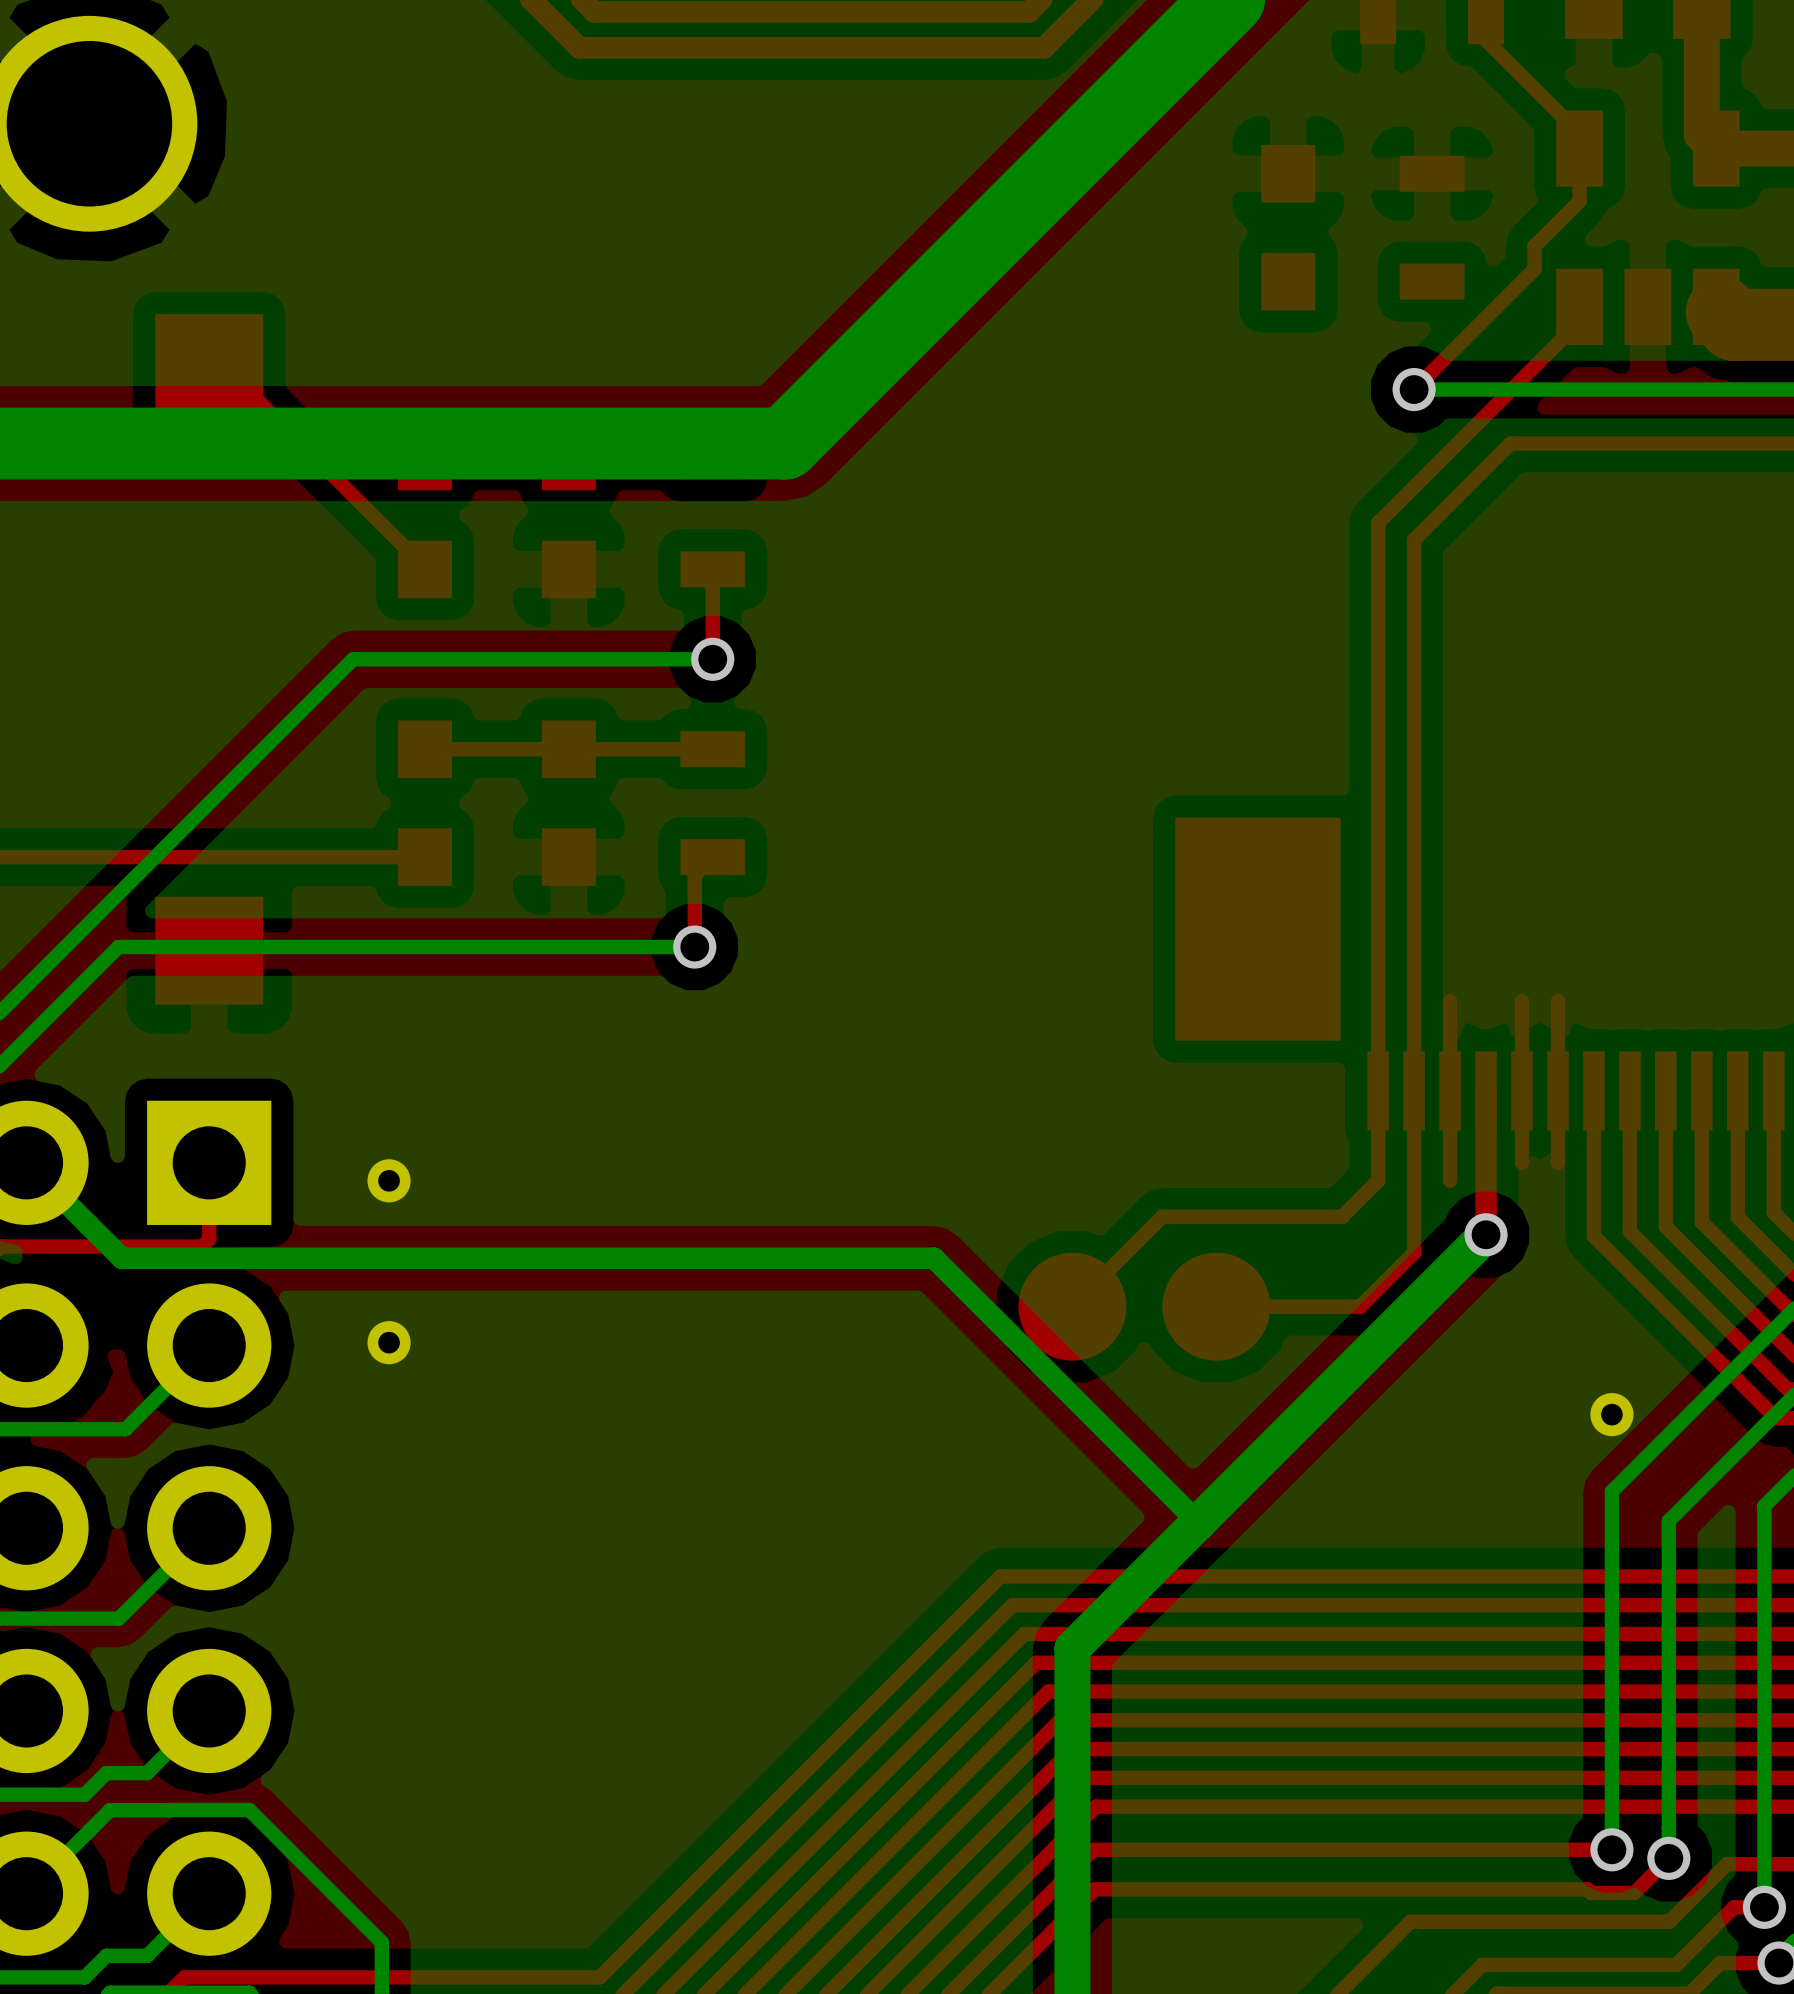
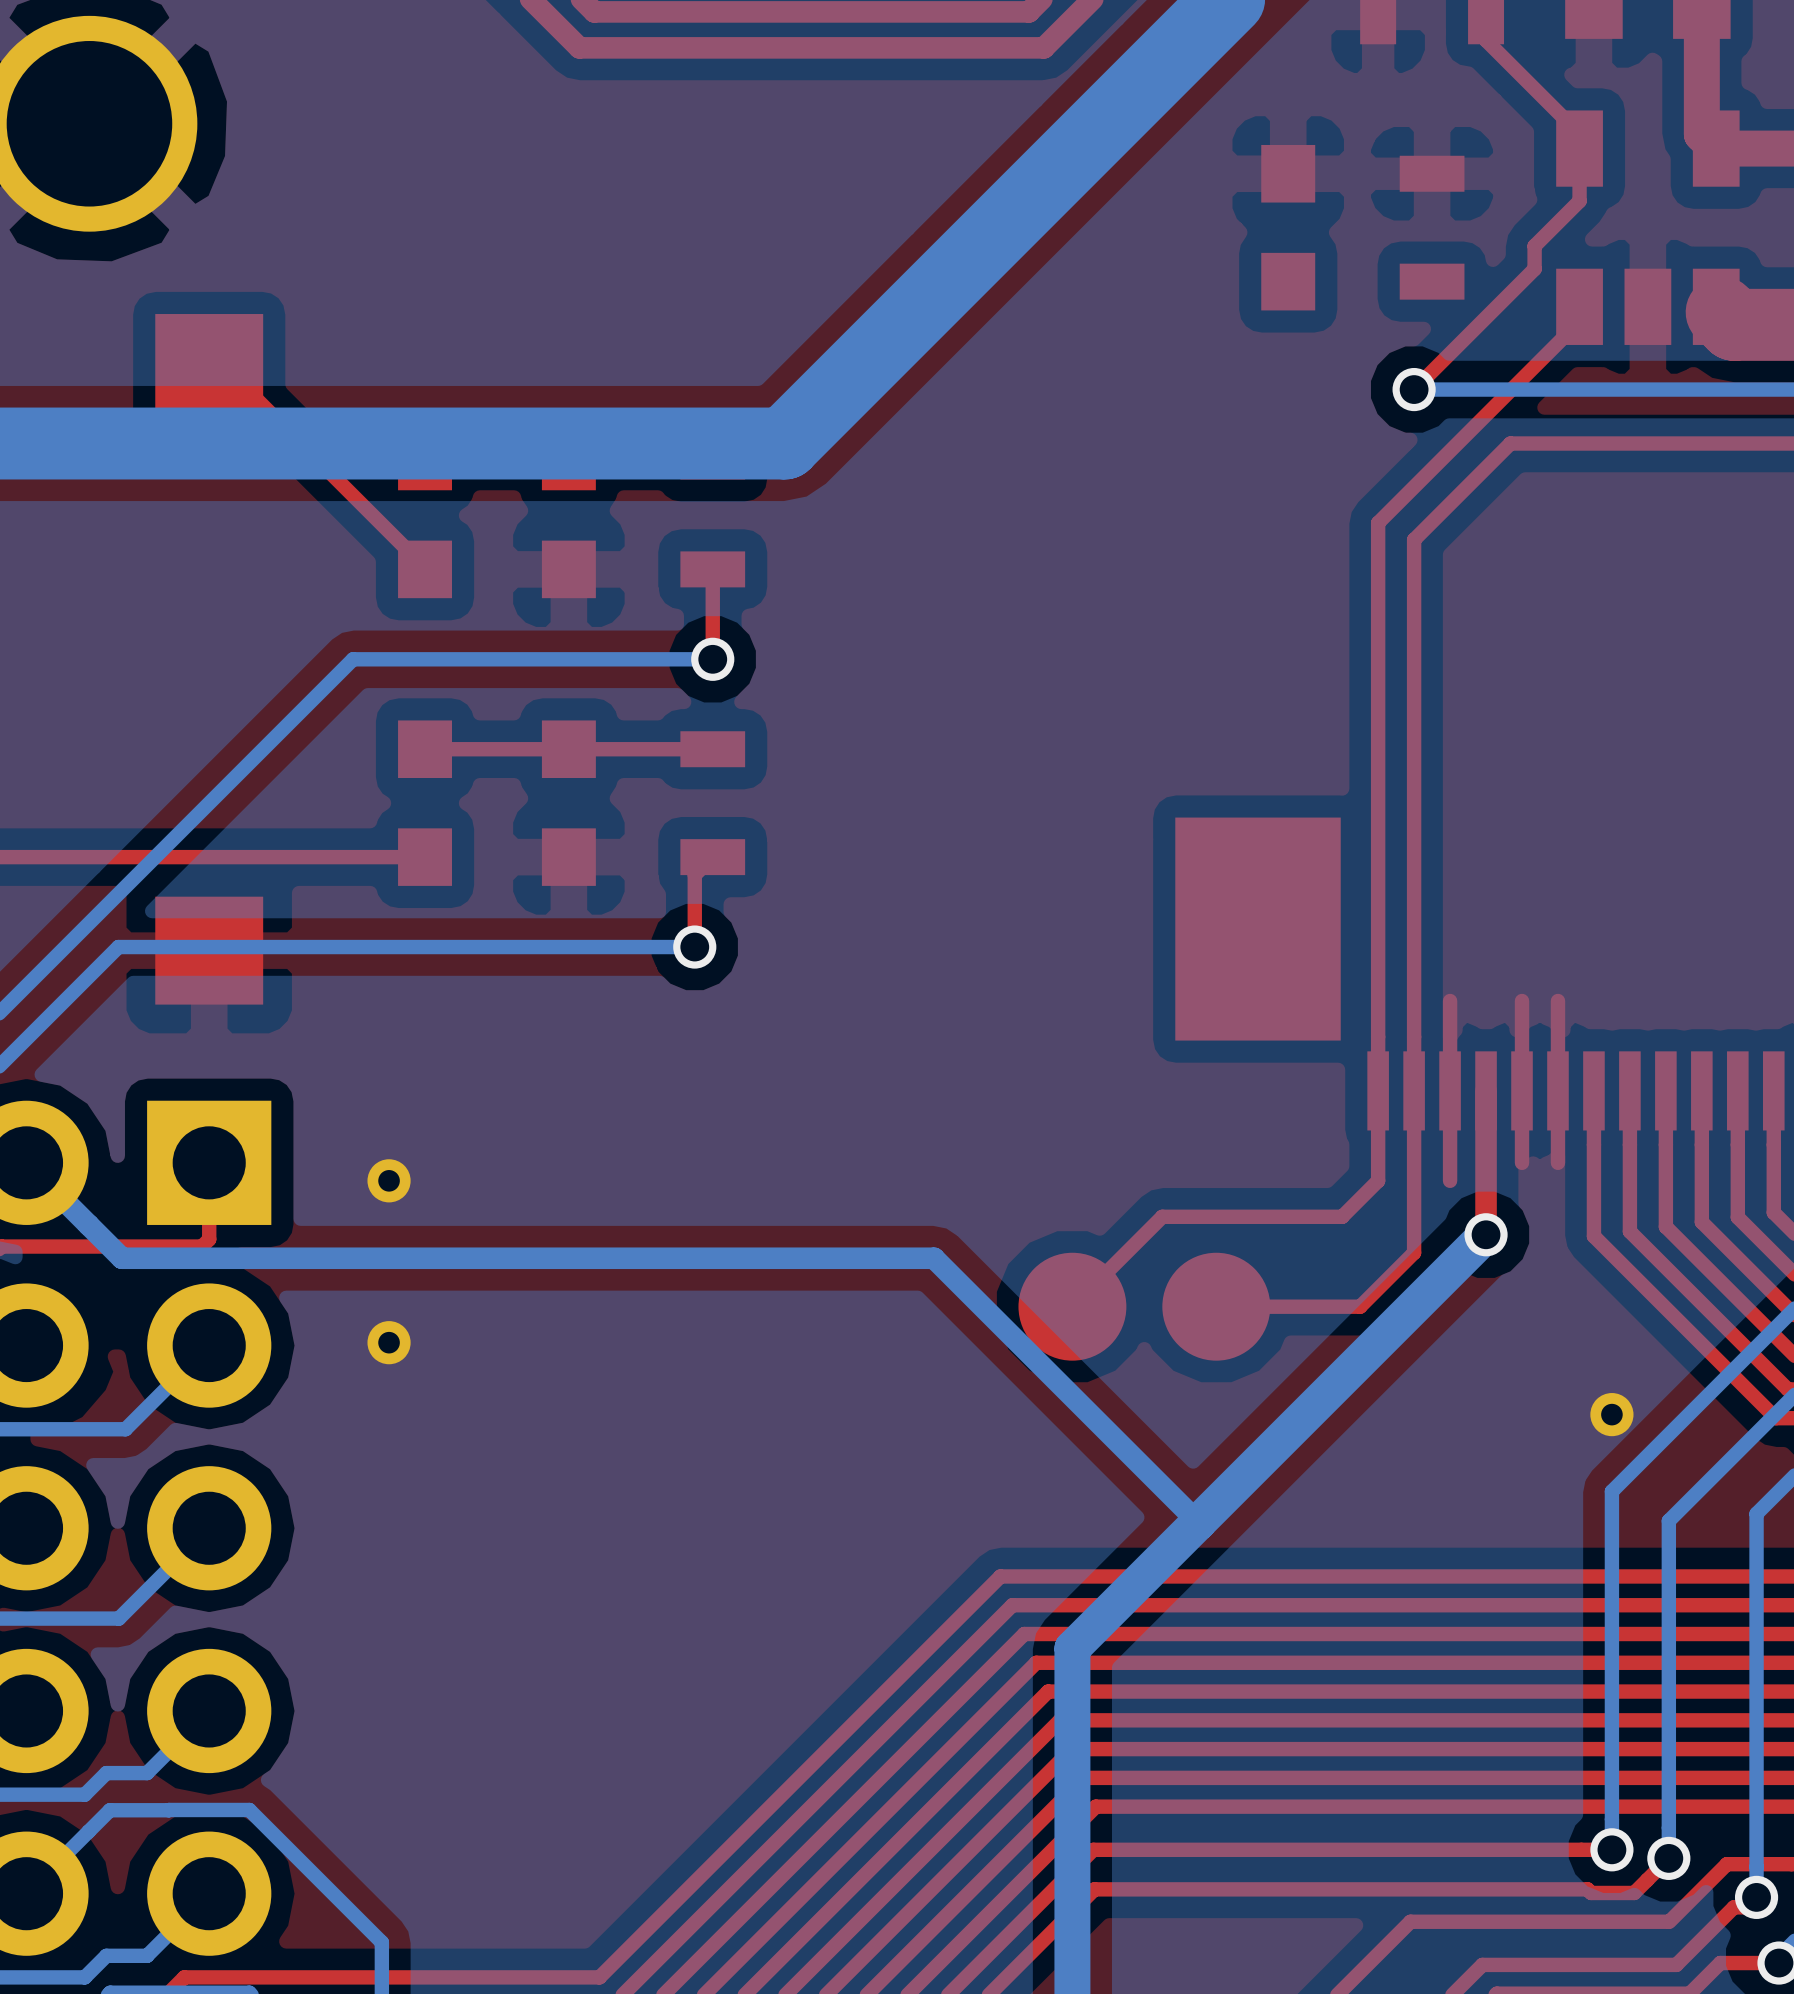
bottom track: (1764, 1505) (1764, 1907) -> (1764, 1505) (1756, 1513) (1756, 1897)
via position: (1764, 1907) -> (1756, 1897)

